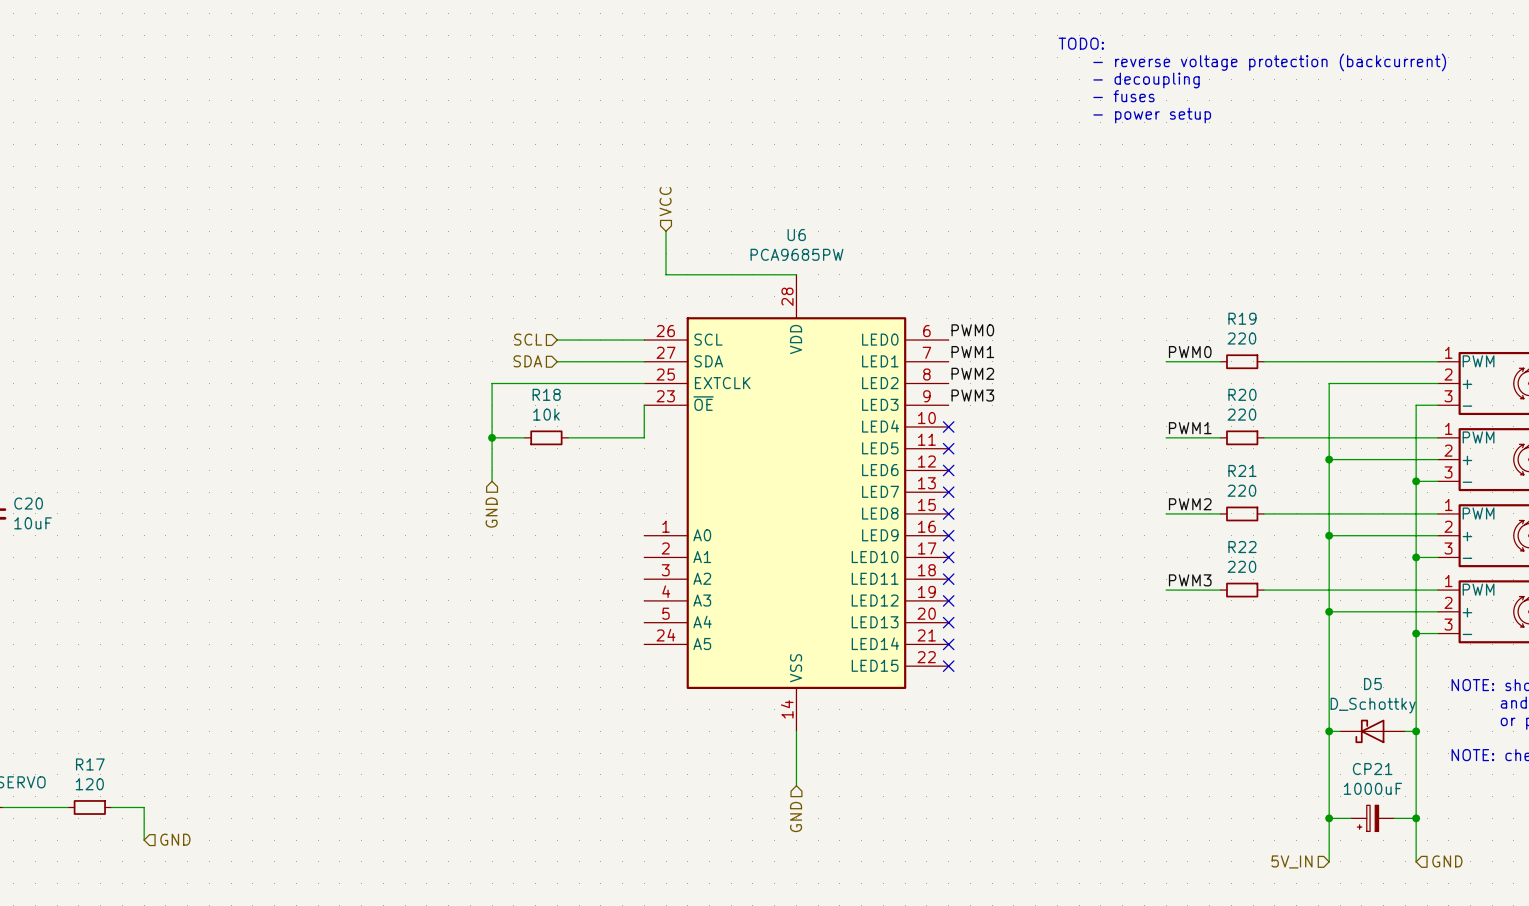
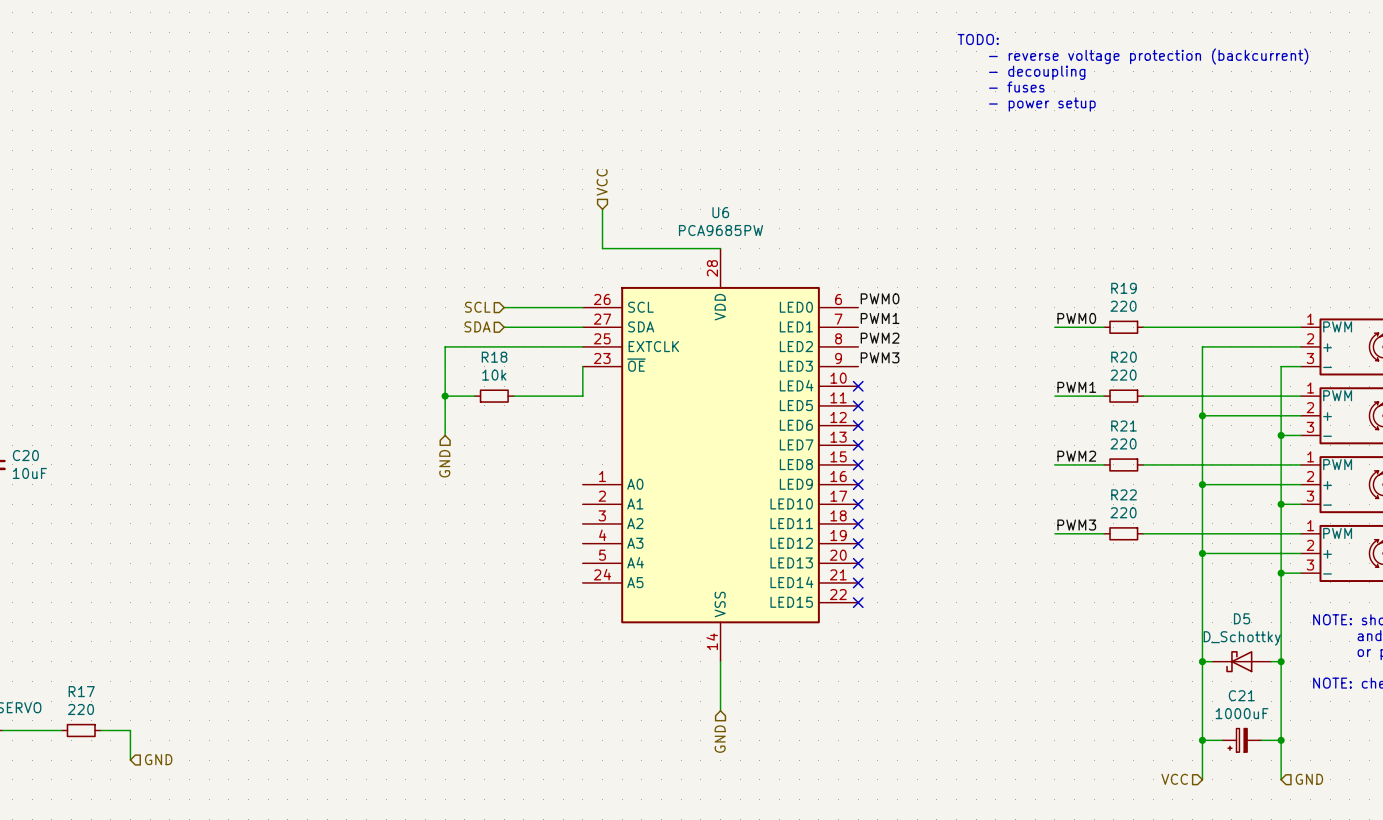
CP21 name: CP21 (1372, 769) -> C21 (1241, 695)
R17 value: 120 (89, 784) -> 220 (81, 709)
hierarchical label: 5V_IN (1291, 861) -> VCC (1174, 779)

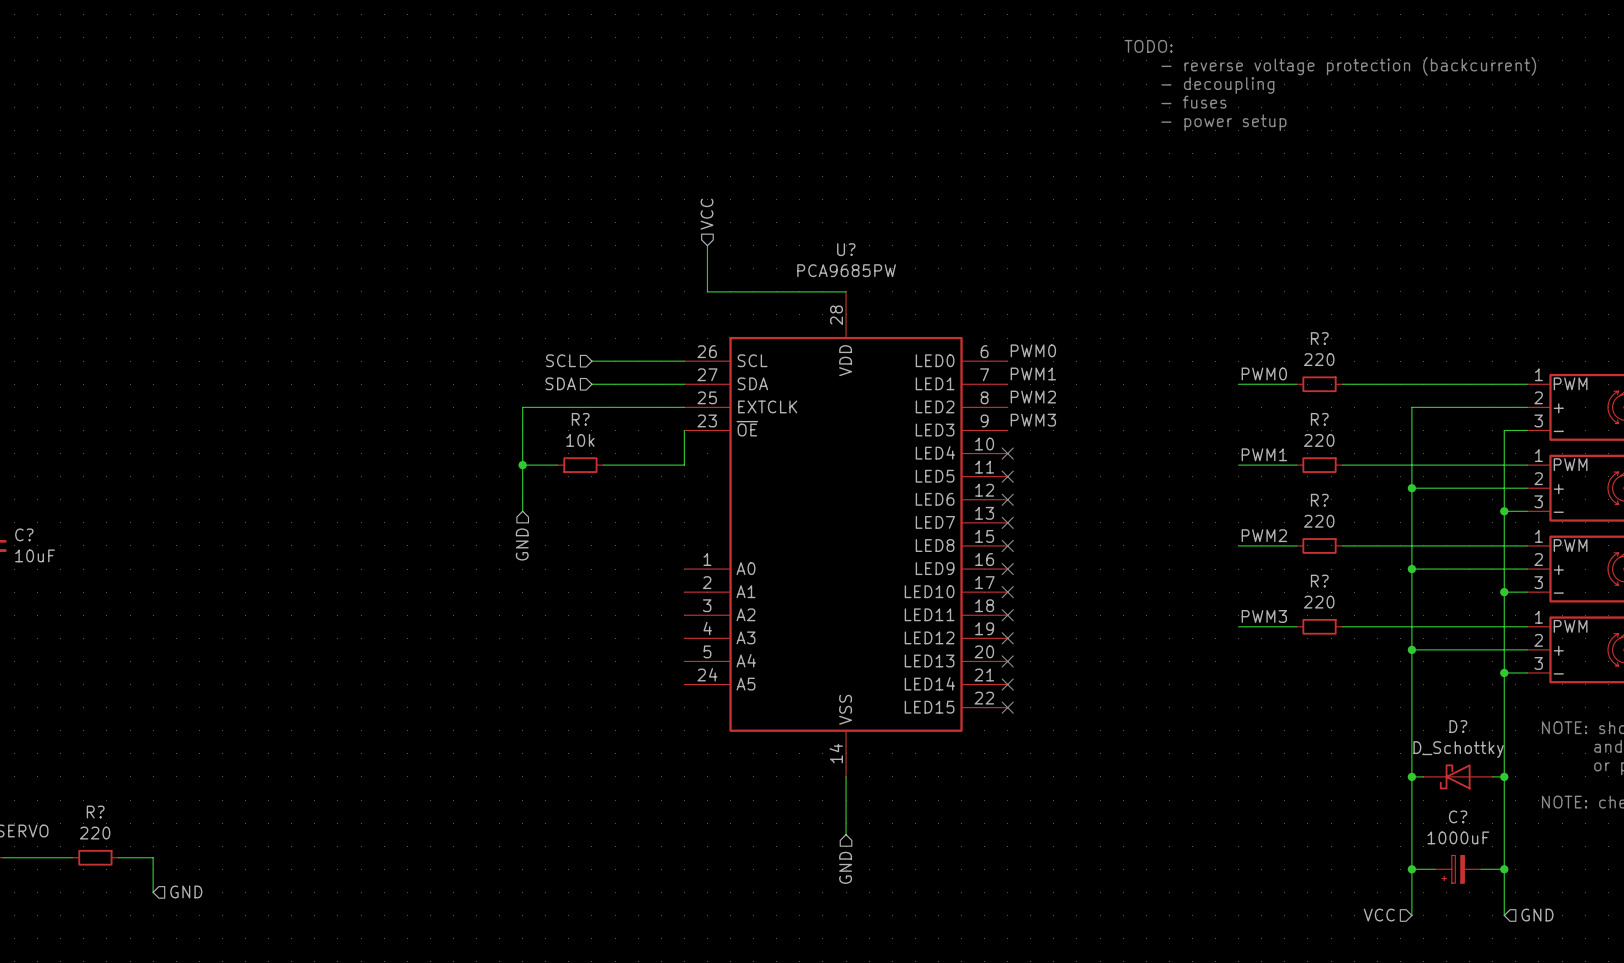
U6 name: U6 (720, 212) -> U? (846, 249)
R19 name: R19 (1124, 288) -> R? (1319, 338)
R18 name: R18 (494, 357) -> R? (580, 419)
R20 name: R20 (1124, 357) -> R? (1319, 419)
R21 name: R21 (1124, 426) -> R? (1319, 500)
C20 name: C20 (25, 455) -> C? (24, 534)
R22 name: R22 (1124, 494) -> R? (1319, 581)
D5 name: D5 (1242, 618) -> D? (1458, 726)
R17 name: R17 (81, 691) -> R? (95, 812)
C21 name: C21 (1241, 695) -> C? (1458, 816)

